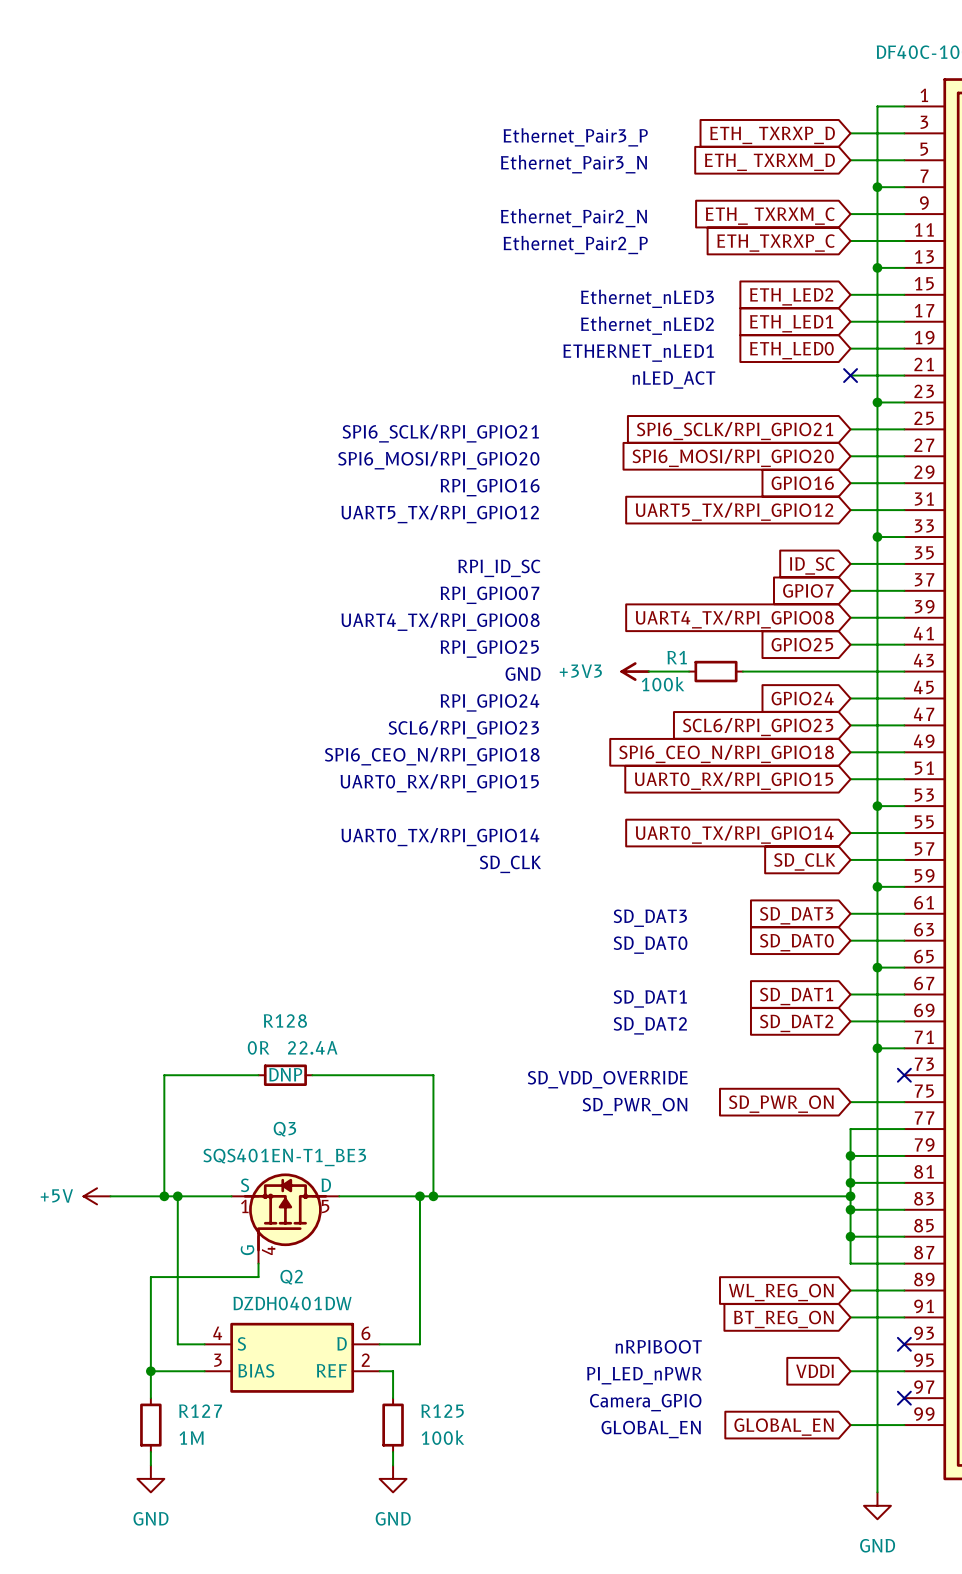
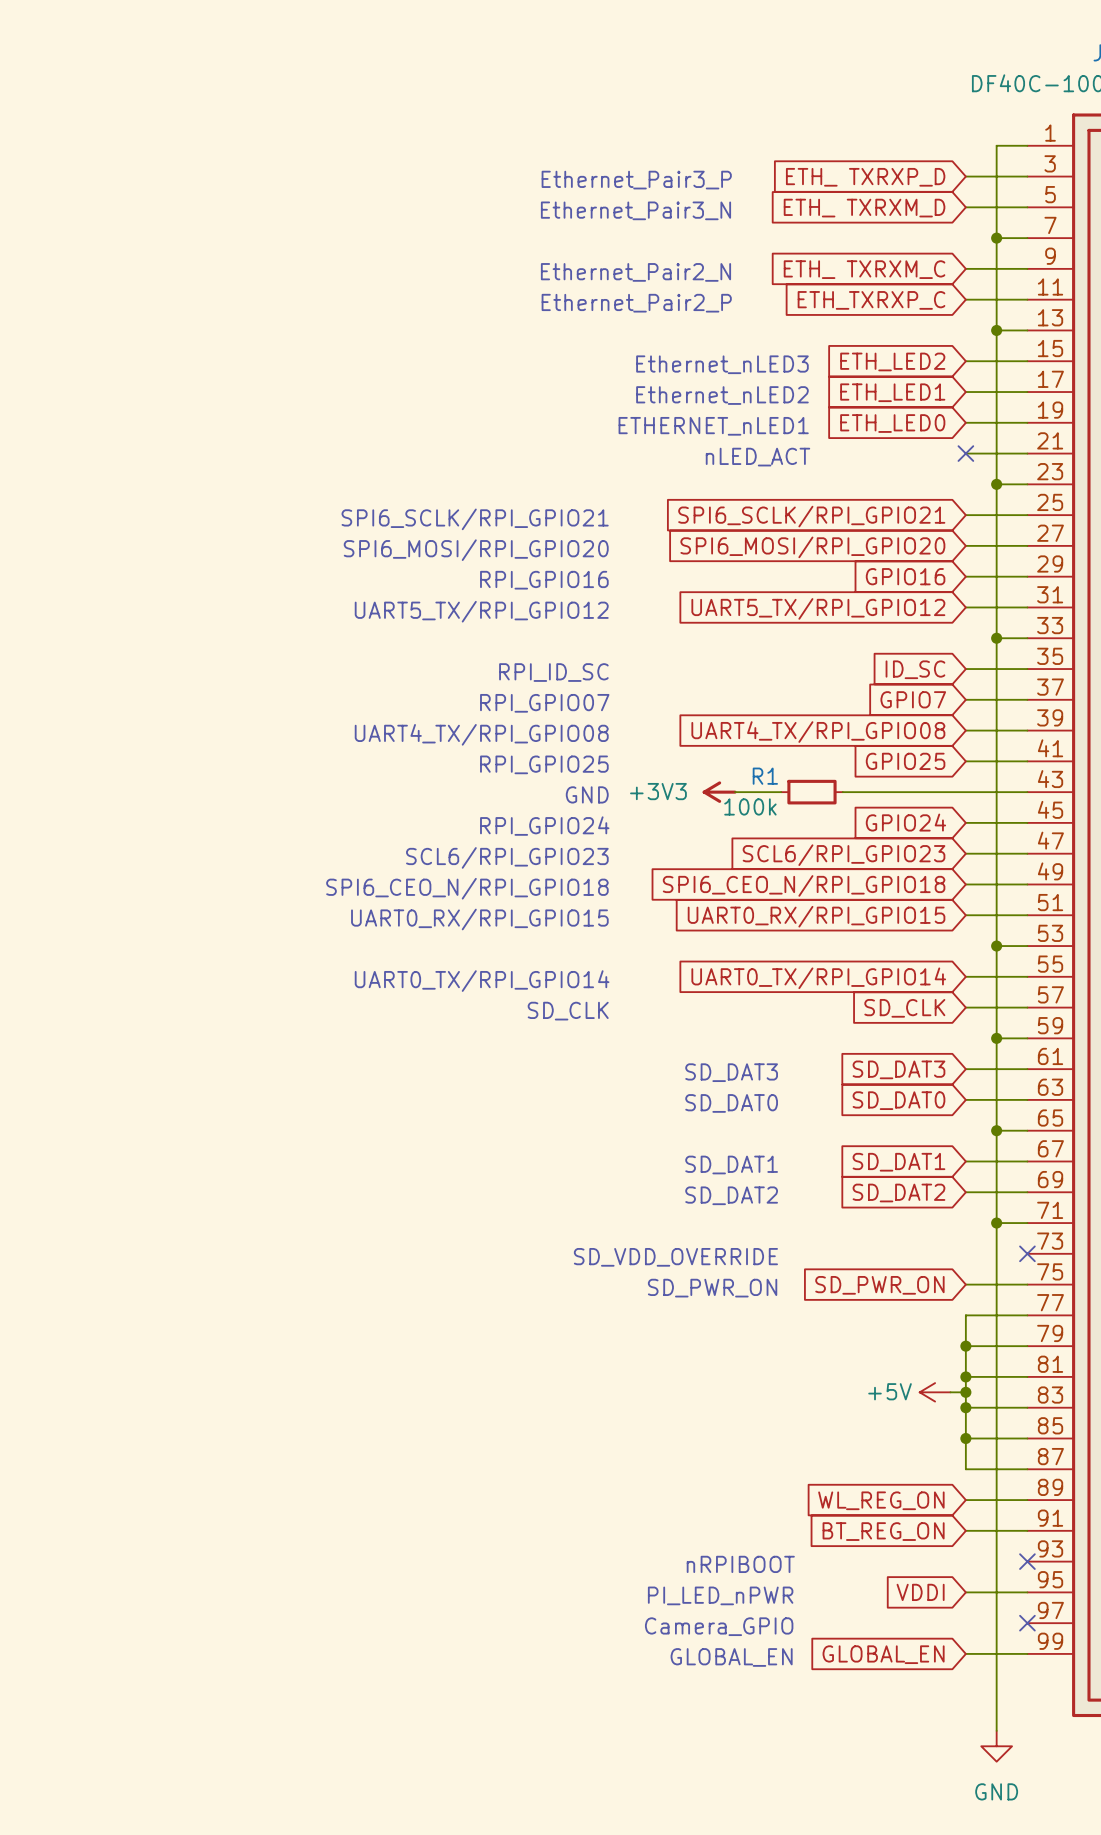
wire: (258, 1075) (164, 1075) (164, 1196) -> none
R128: (285, 1075) -> none
wire: (312, 1075) (433, 1075) (433, 1196) -> none
power symbol: +5V (97, 1196) -> none
wire: (110, 1196) (231, 1196) -> none
junction: (164, 1196) -> none
wire: (177, 1196) (177, 1344) (204, 1344) -> none
junction: (177, 1196) -> none
wire: (339, 1196) (837, 1196) -> none
wire: (419, 1196) (419, 1344) (379, 1344) -> none
junction: (419, 1196) -> none
junction: (433, 1196) -> none
power symbol: none -> +5V (935, 1392)
Q3: (285, 1218) -> none
wire: (258, 1263) (258, 1277) (150, 1277) (150, 1398) -> none
Q2: DZDH0401DW (292, 1357) -> none
wire: (150, 1371) (204, 1371) -> none
junction: (150, 1371) -> none
wire: (379, 1371) (393, 1371) (393, 1398) -> none
R127: (150, 1425) -> none
R125: (393, 1425) -> none
wire: (150, 1451) (150, 1465) -> none
wire: (393, 1451) (393, 1465) -> none
power symbol: GND (150, 1478) -> none
power symbol: GND (393, 1478) -> none

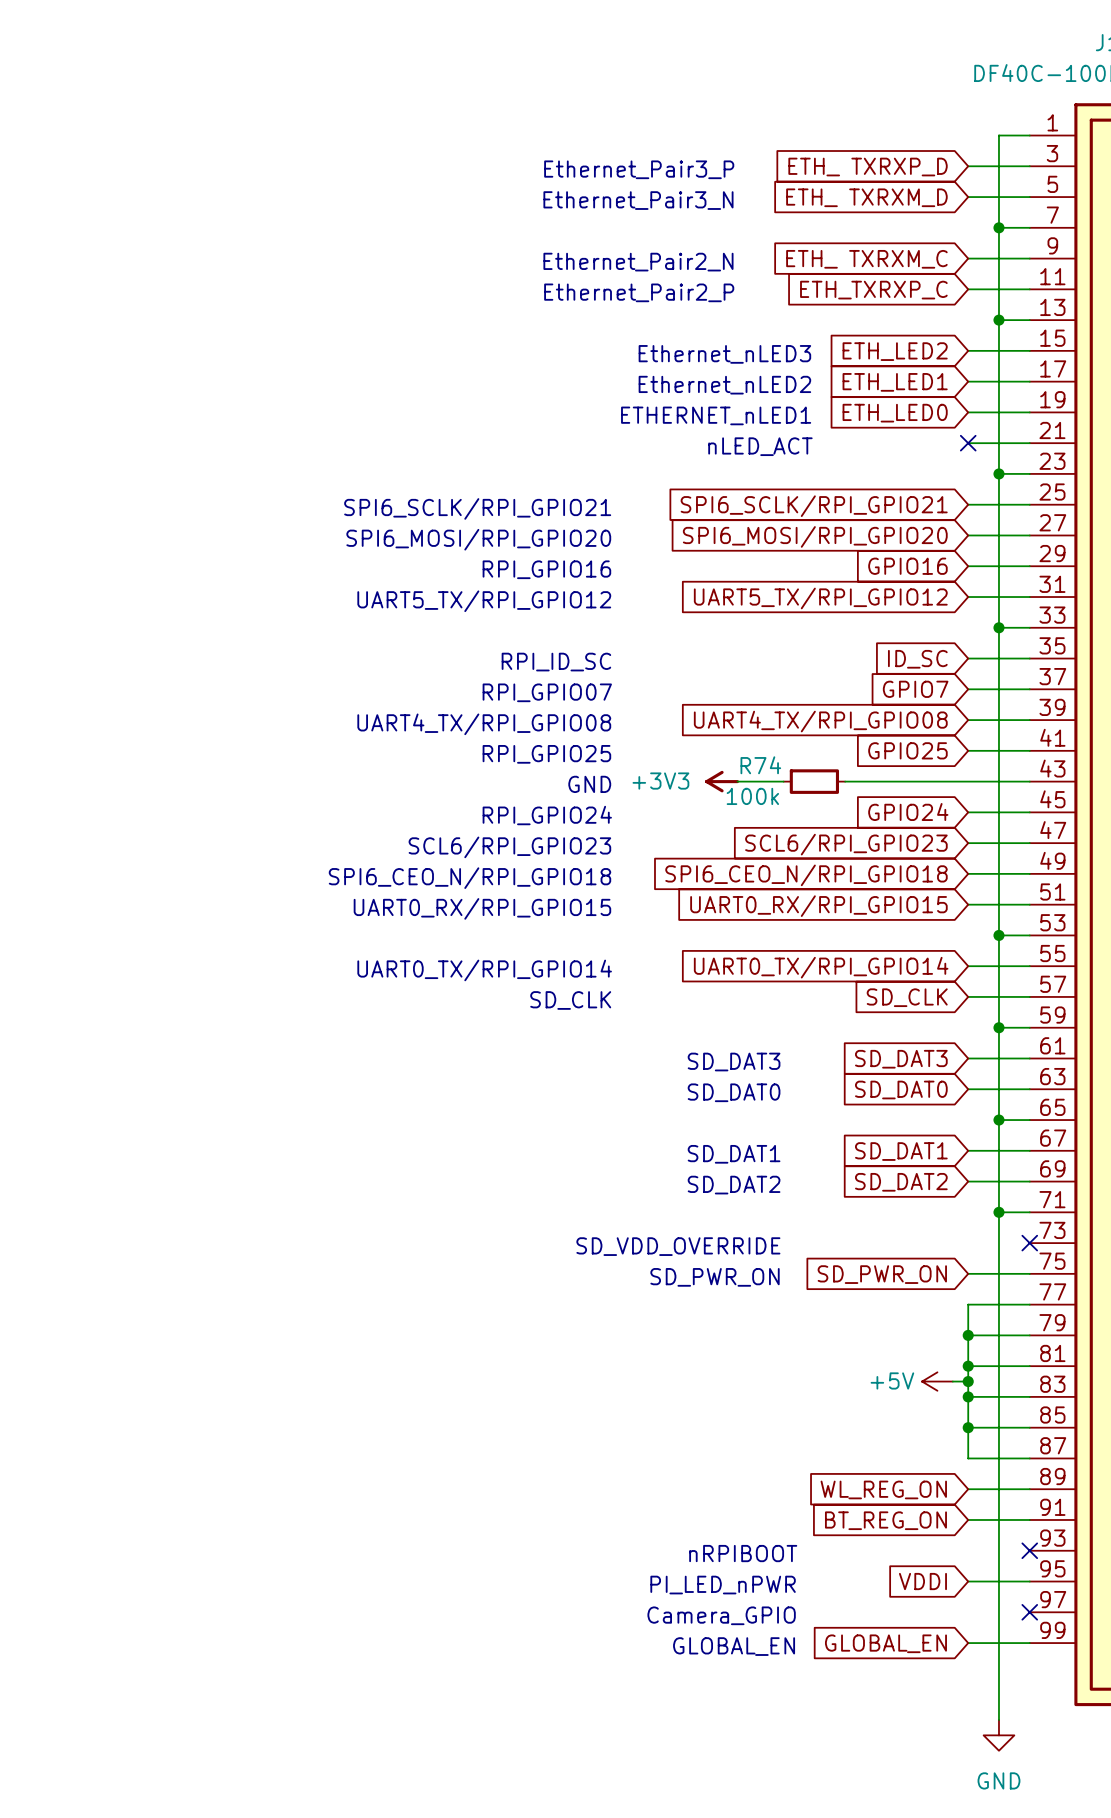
R1 name: R1 (765, 776) -> R74 (760, 765)

